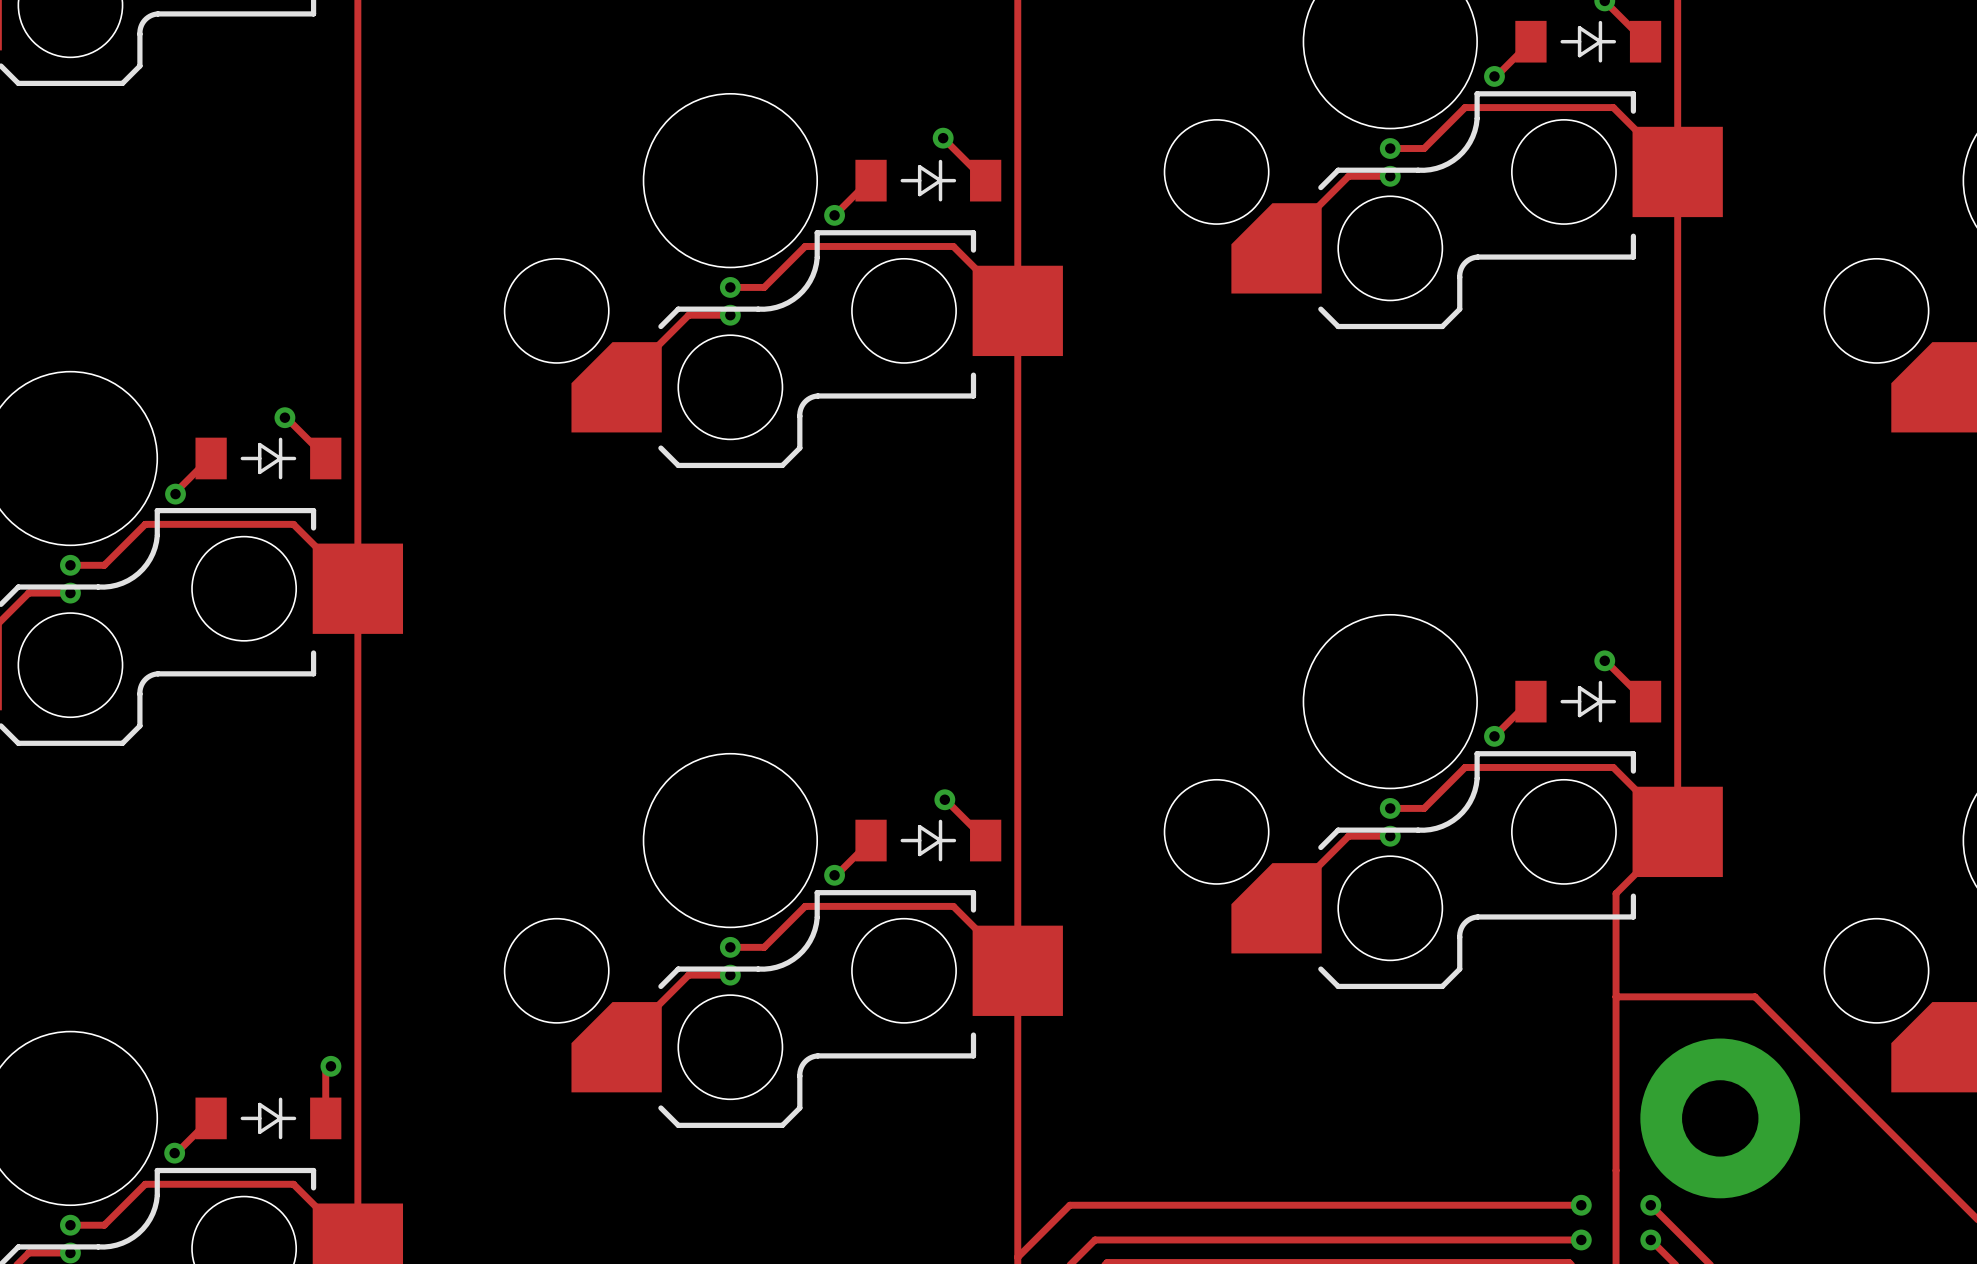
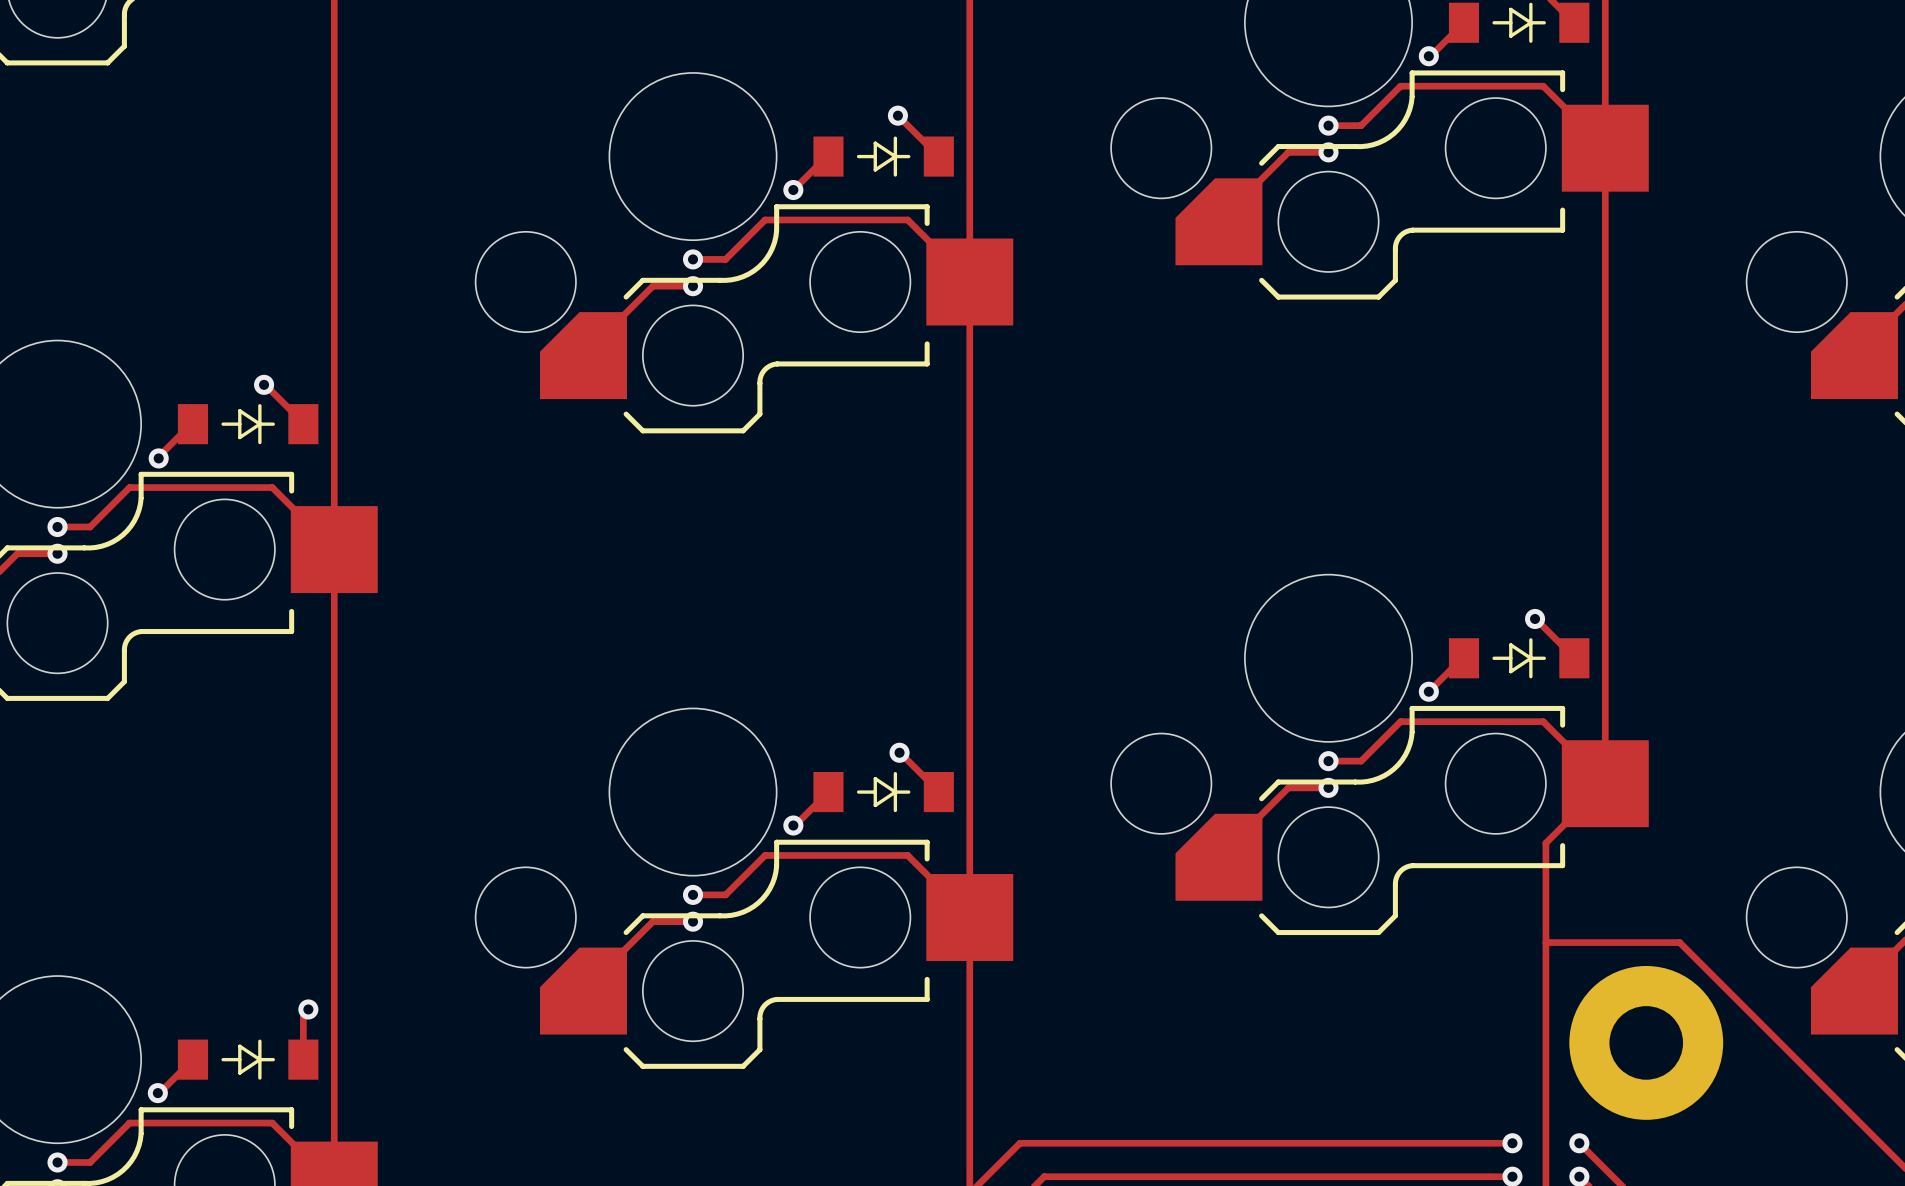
part position: (1720, 1118) -> (1646, 1042)

